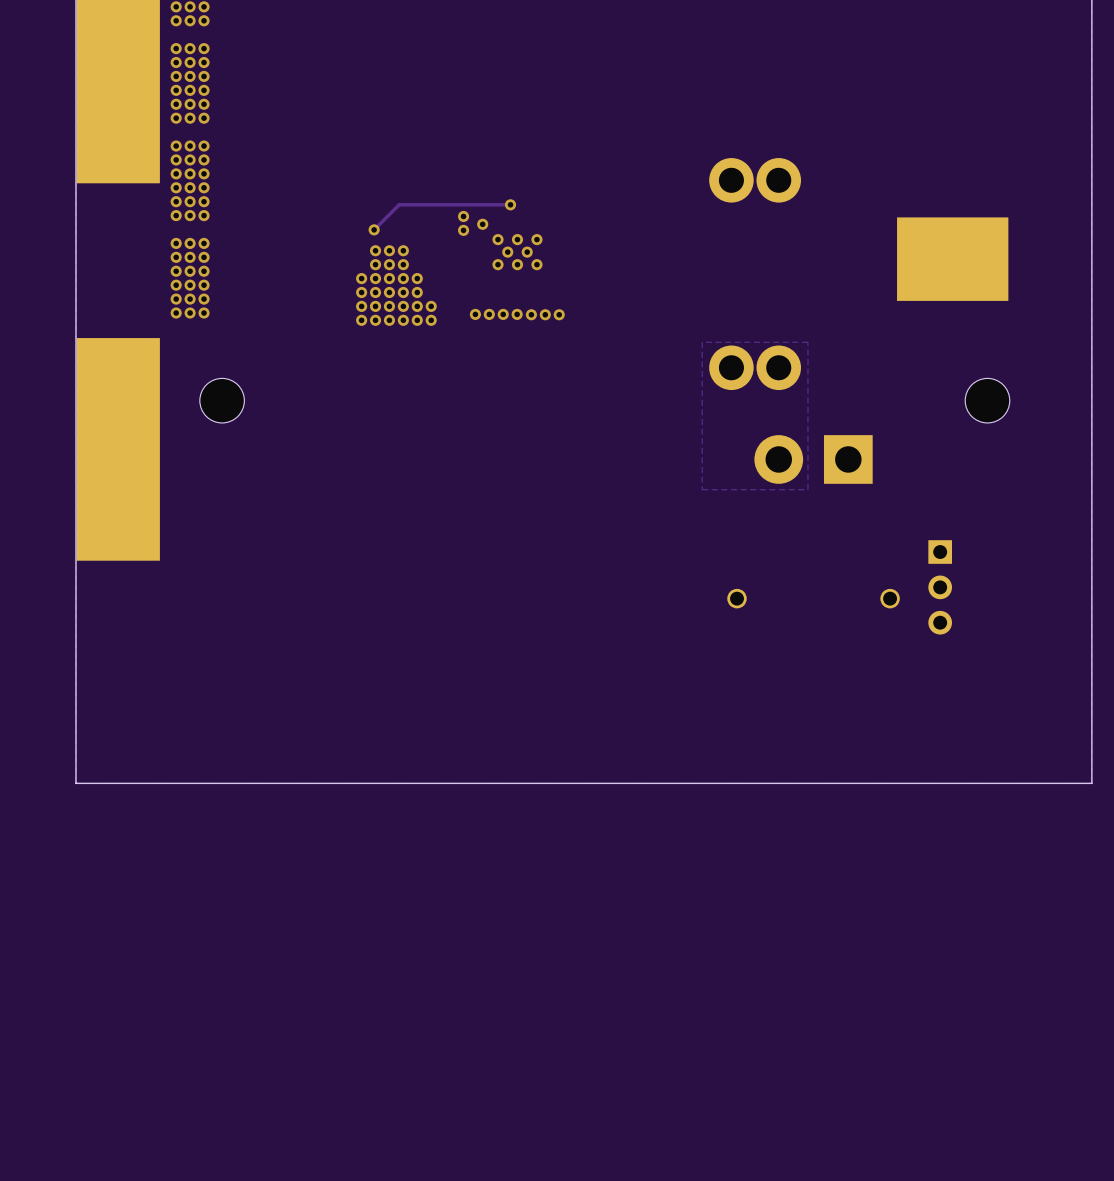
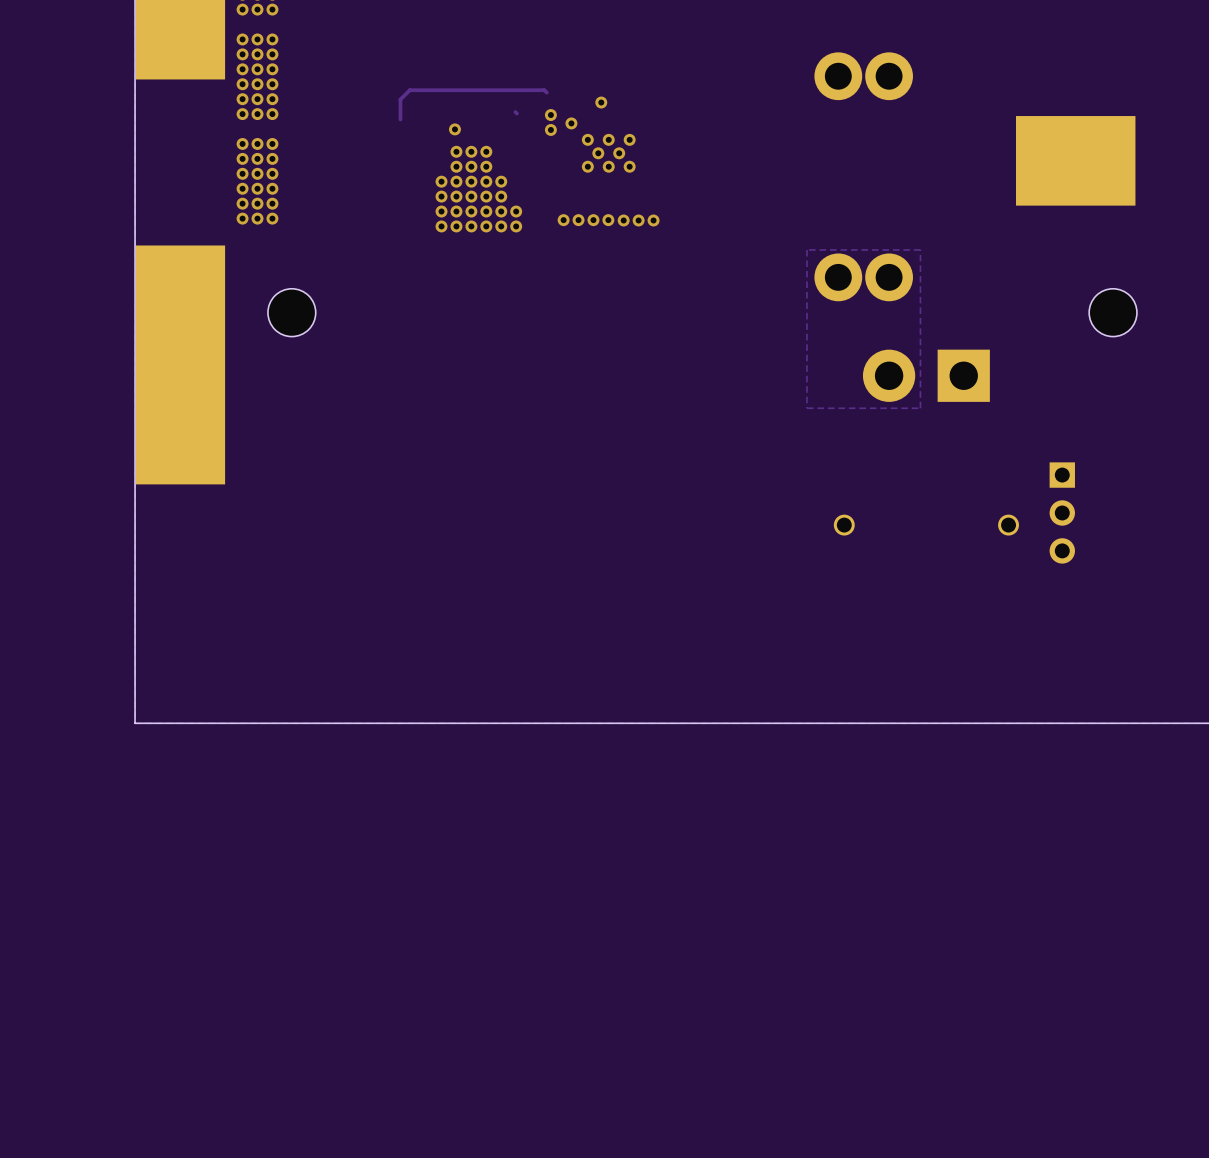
track: none -> (546, 92) (544, 90) (409, 90) (400, 99) (400, 119)
track: (510, 204) (399, 204) (374, 229) -> none
track: none -> (515, 112) (516, 113)

